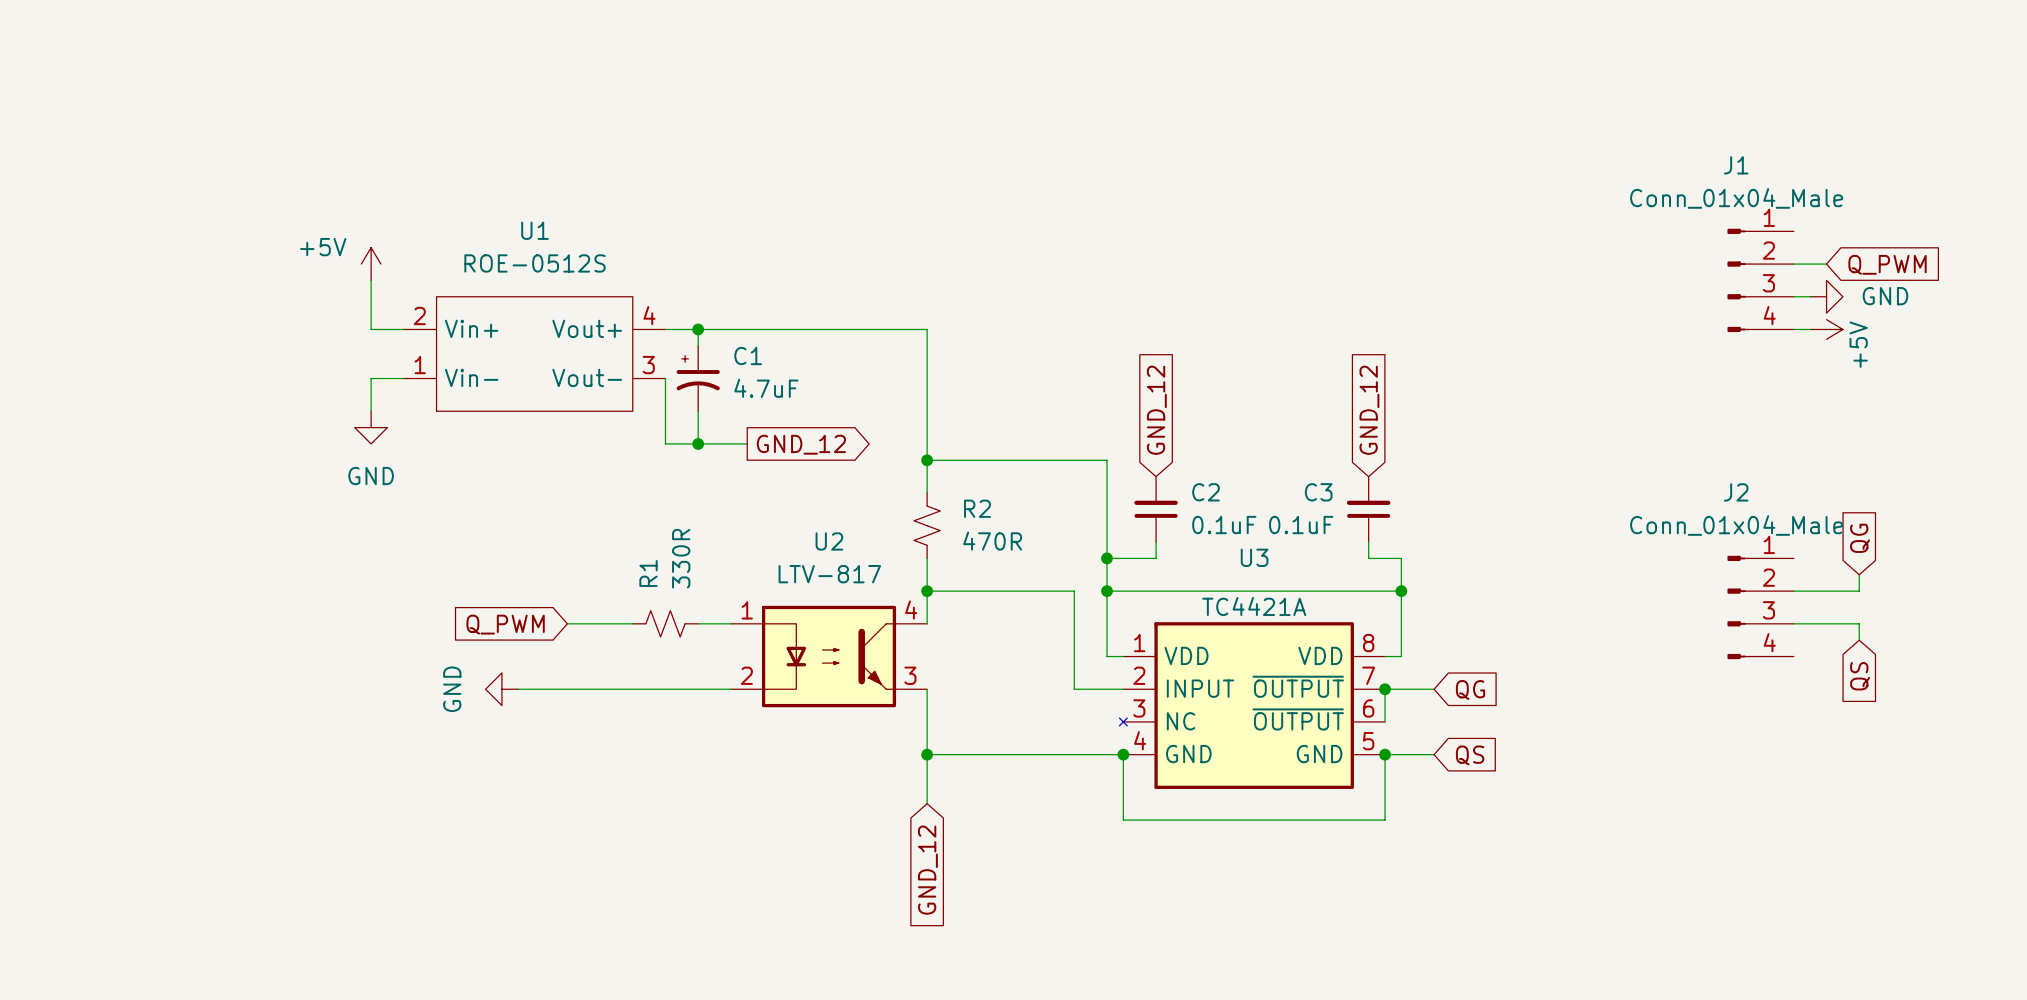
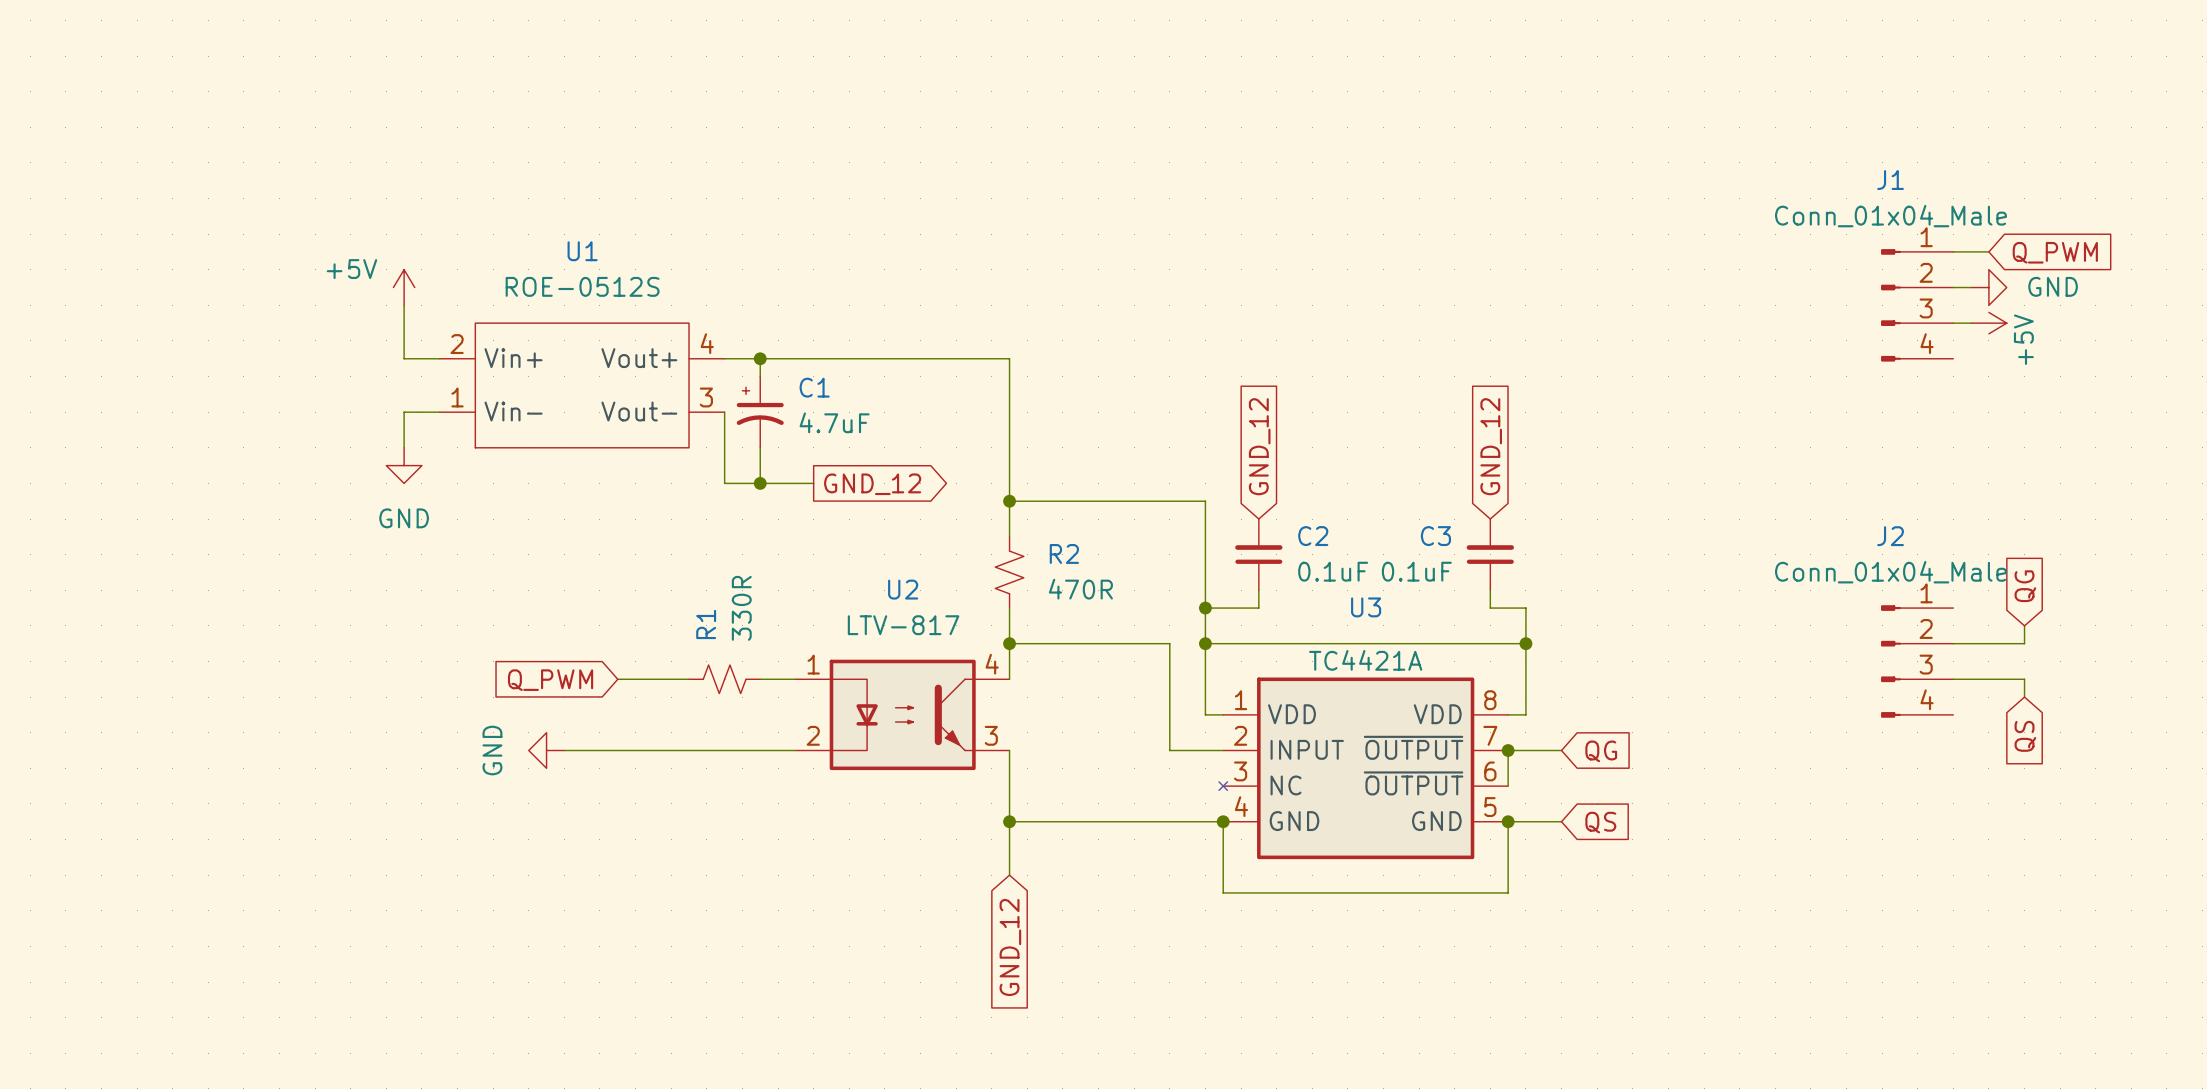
wire: none -> (1953, 251) (1988, 251)
power symbol: none -> GND (1988, 287)
global label position: Q_PWM (1887, 264) -> Q_PWM (2055, 252)
power symbol: GND (1826, 296) -> +5V (1988, 323)
wire: (1793, 329) (1810, 329) -> none
power symbol: +5V (1826, 329) -> none

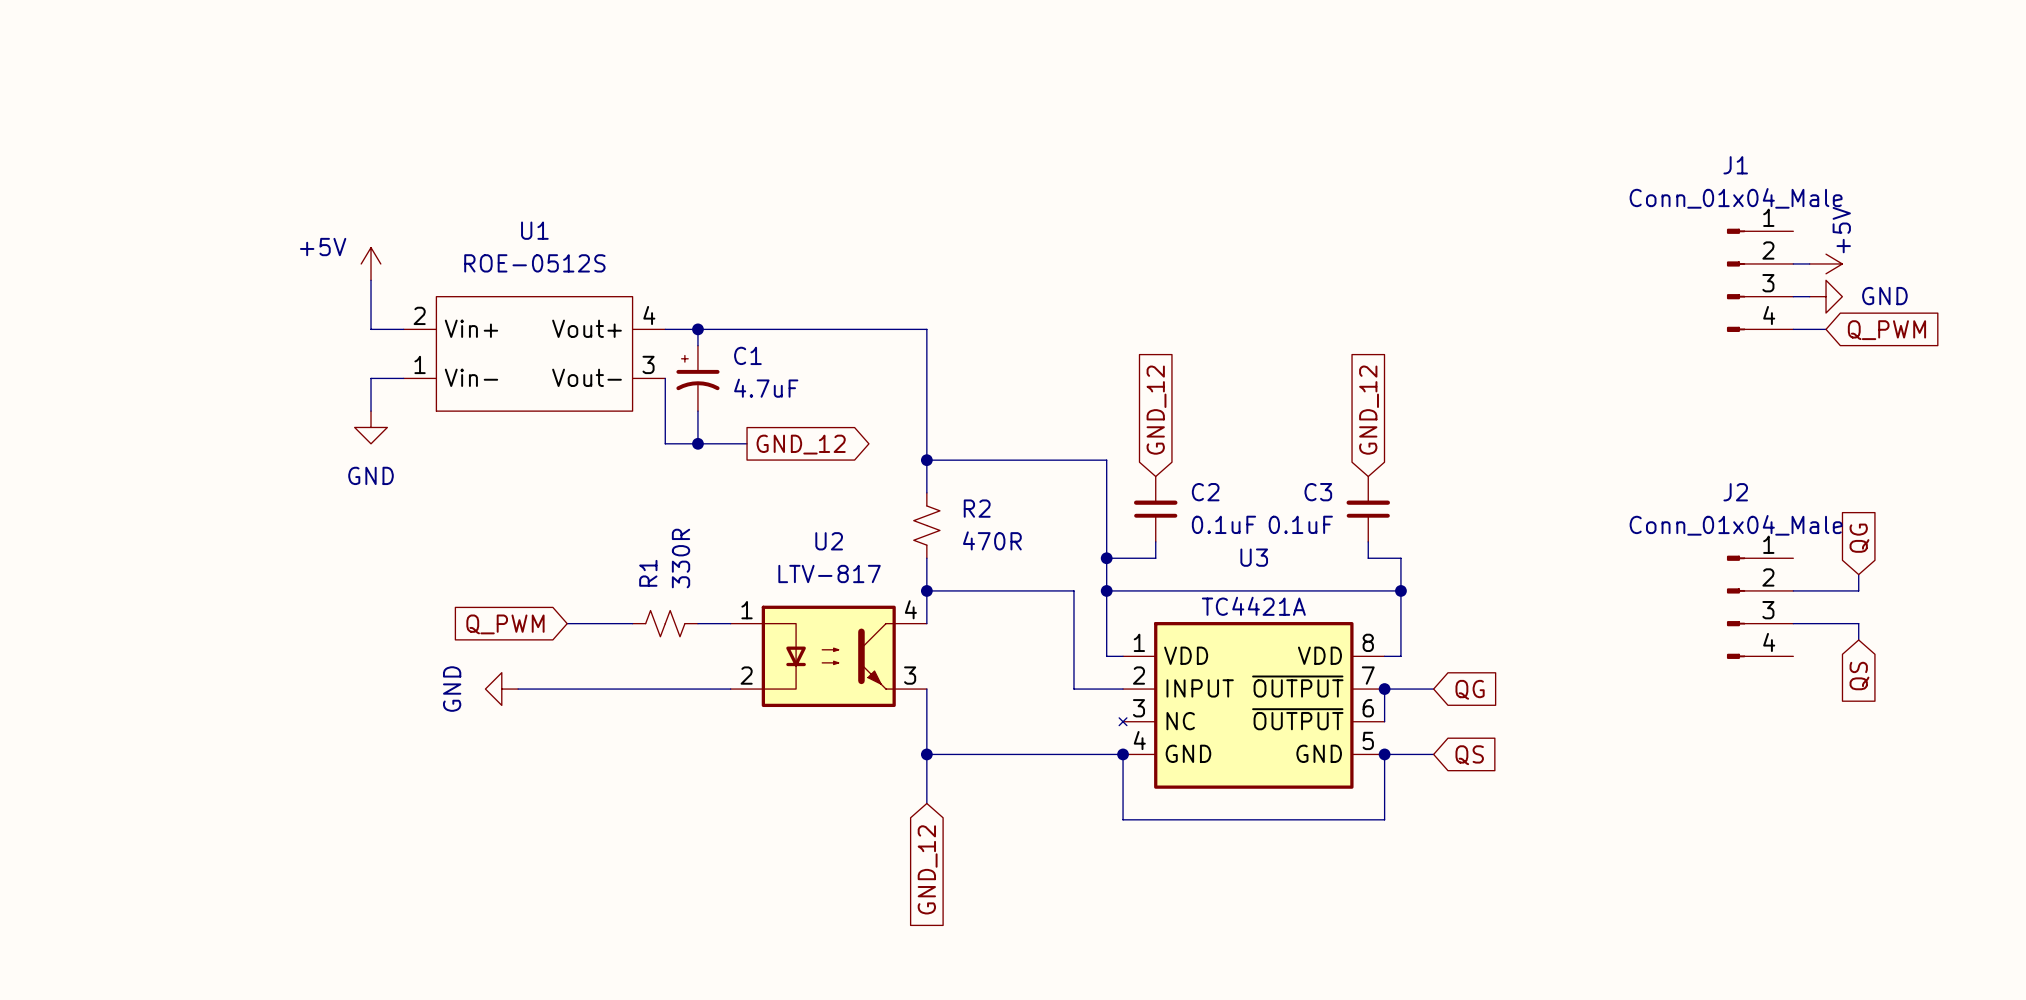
wire: (1953, 251) (1988, 251) -> (1793, 329) (1826, 329)
global label position: Q_PWM (2055, 252) -> Q_PWM (1886, 330)
power symbol: GND (1988, 287) -> +5V (1826, 263)
power symbol: +5V (1988, 323) -> GND (1826, 296)

